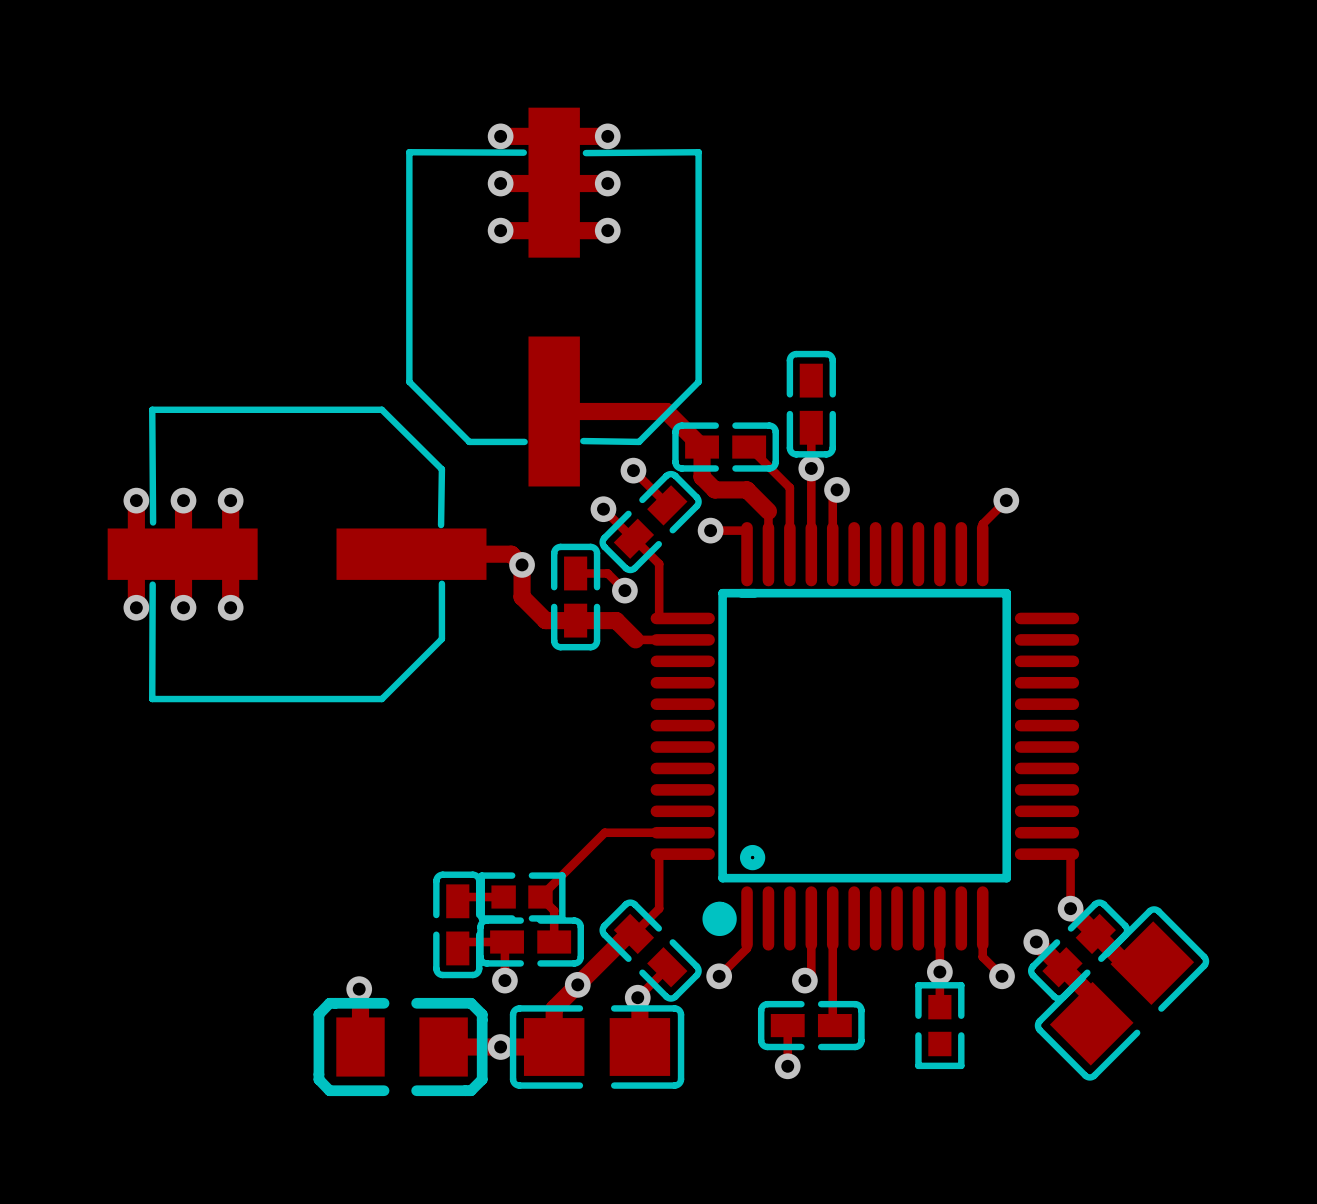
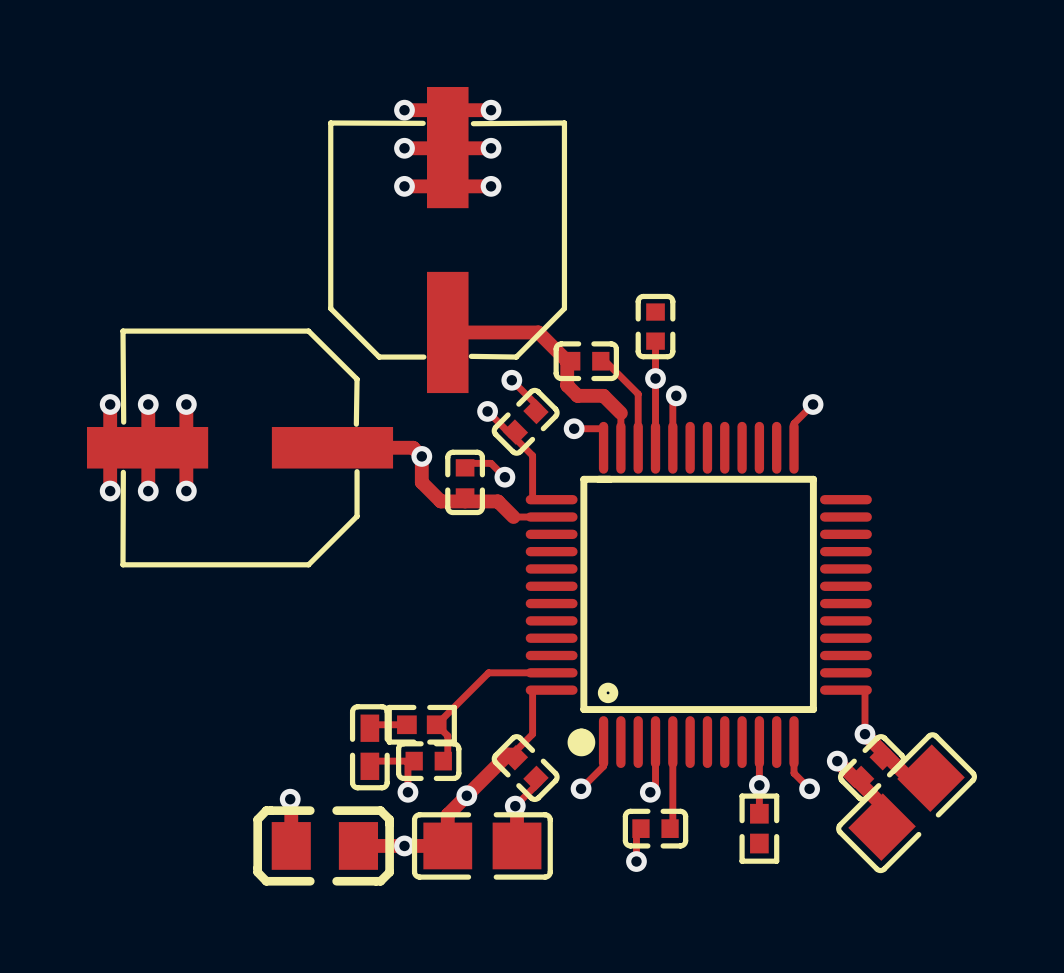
part footprint: [786, 350, 836, 458] -> [635, 293, 676, 360]
part footprint: [672, 422, 779, 472] -> [553, 341, 619, 382]
part footprint: [599, 470, 702, 574] -> [491, 387, 560, 456]
part footprint: [550, 543, 601, 651] -> [445, 449, 485, 516]
part footprint: [599, 899, 702, 1002] -> [491, 734, 560, 803]
part footprint: [1027, 899, 1131, 1002] -> [837, 734, 906, 803]
part footprint: [477, 917, 584, 967] -> [396, 741, 462, 782]
part footprint: [757, 1000, 865, 1051] -> [622, 808, 689, 849]

